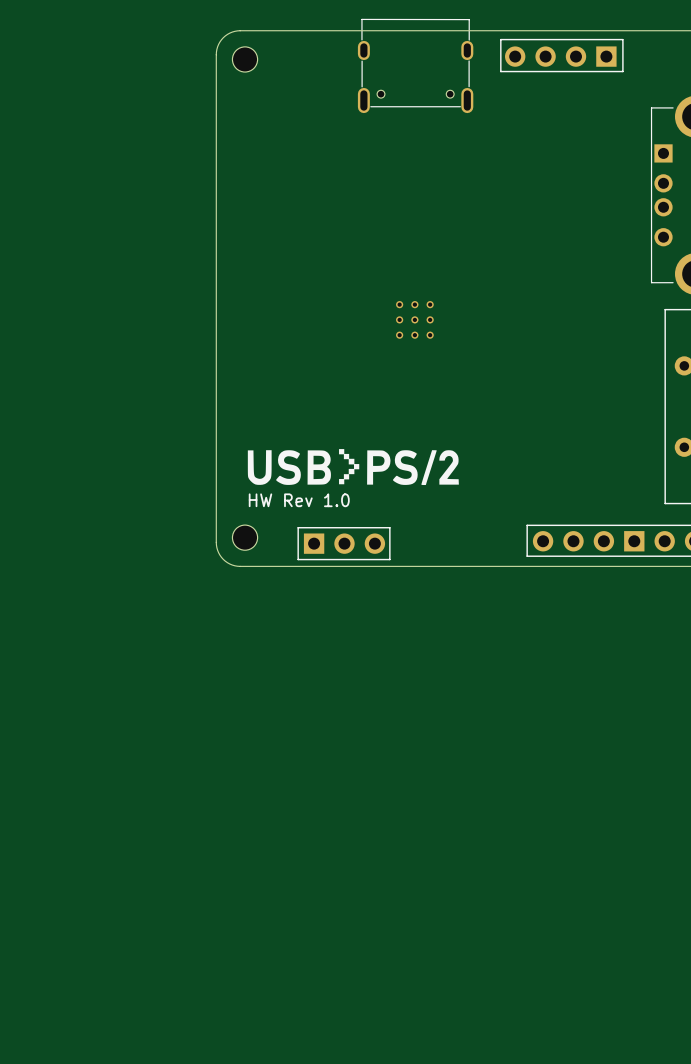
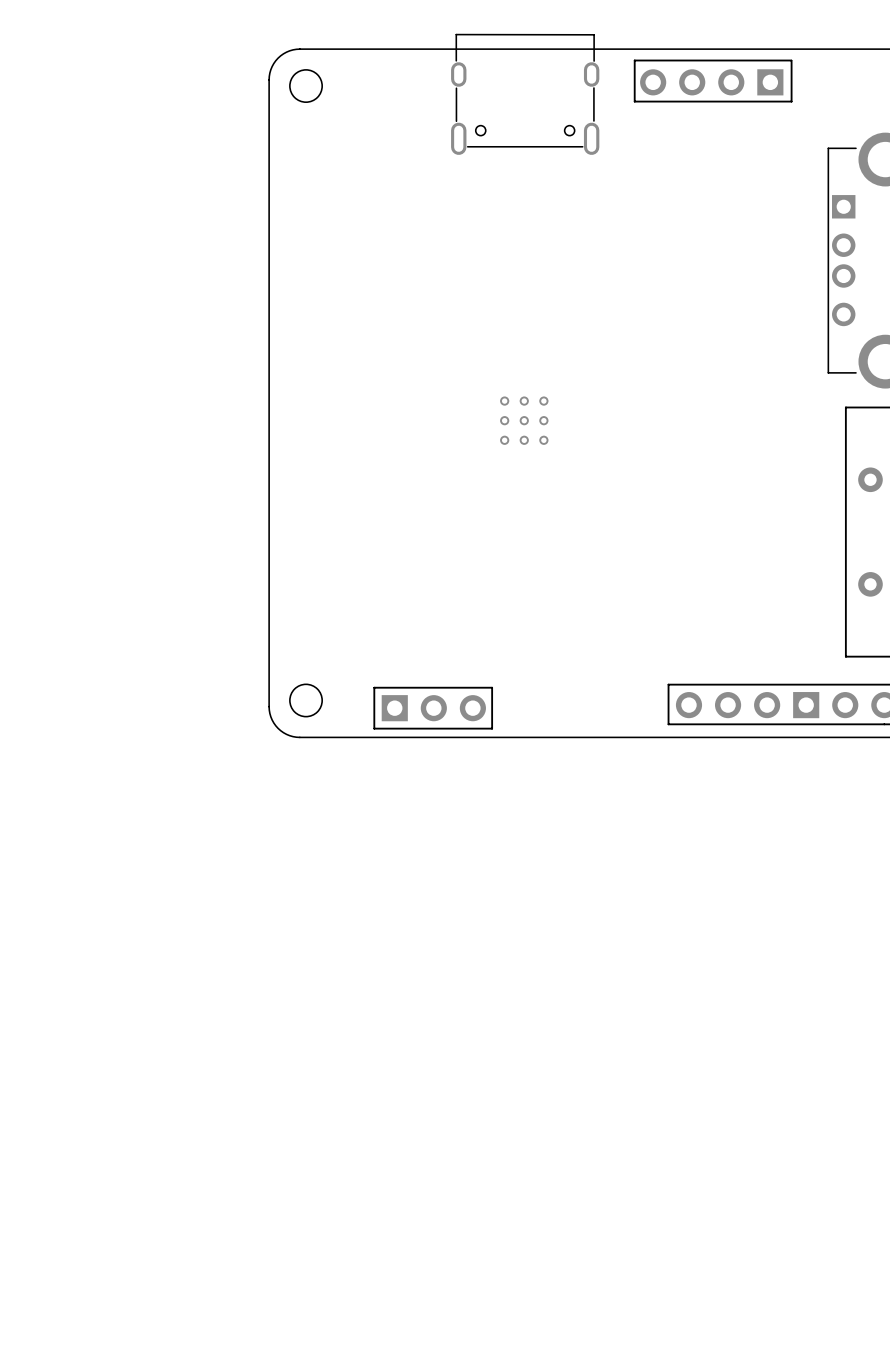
drawing: [247, 449, 459, 486] -> none
text: HW Rev 1.0 (299, 500) -> none

